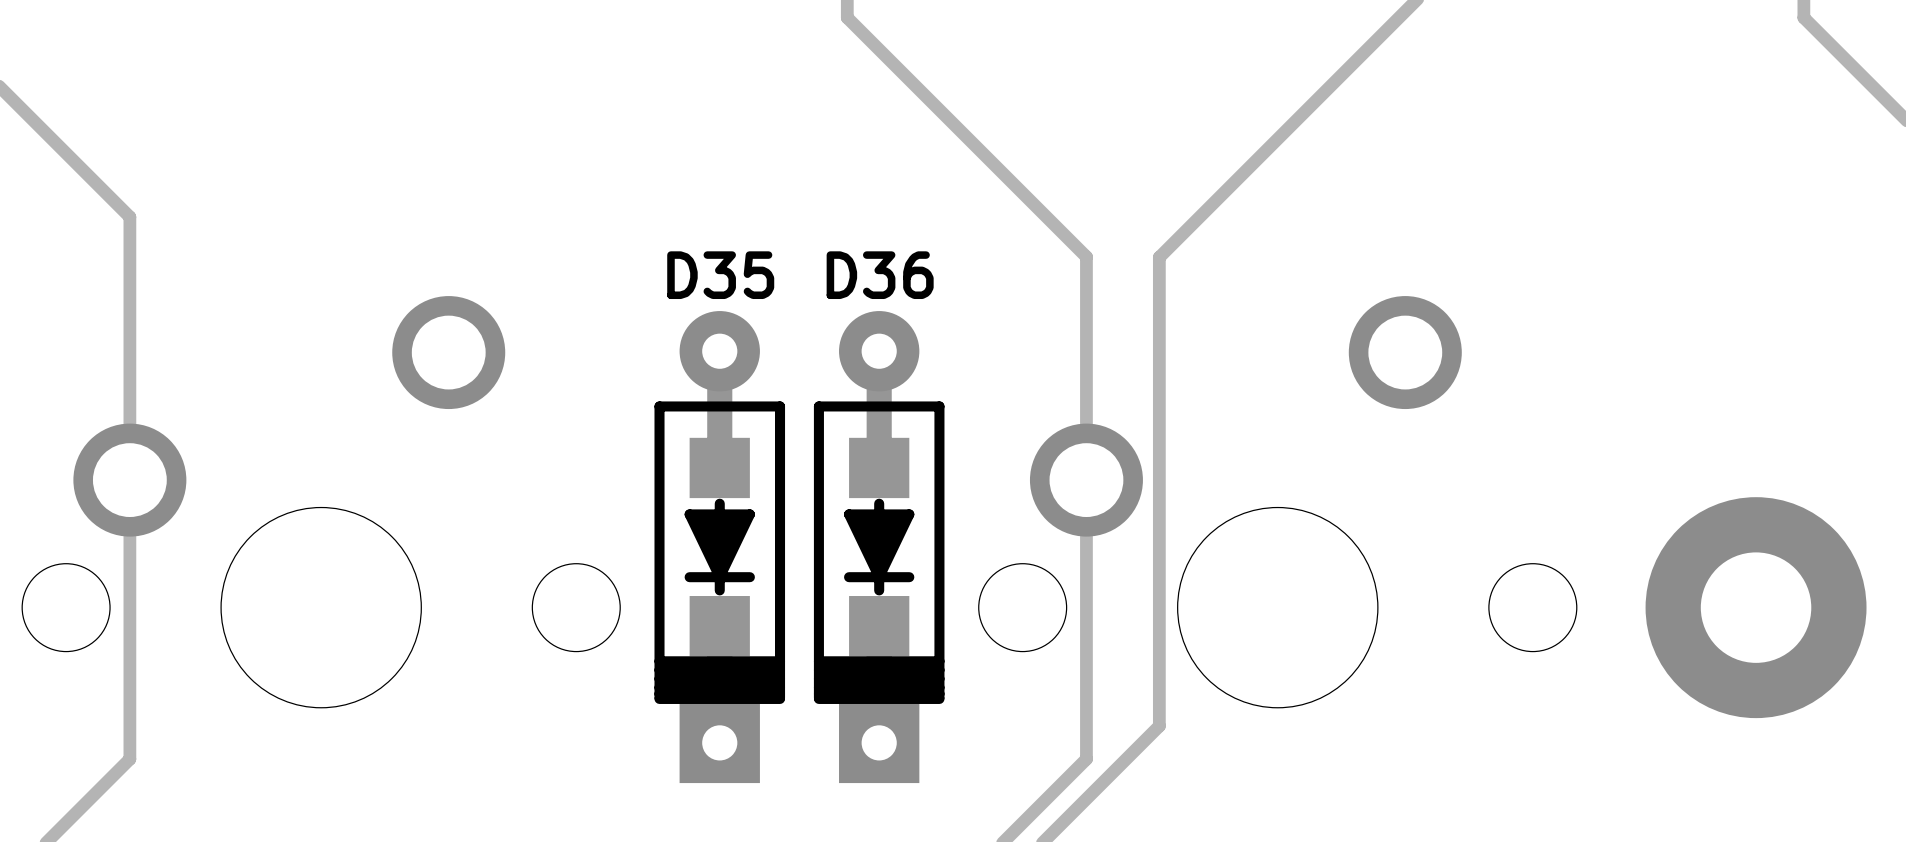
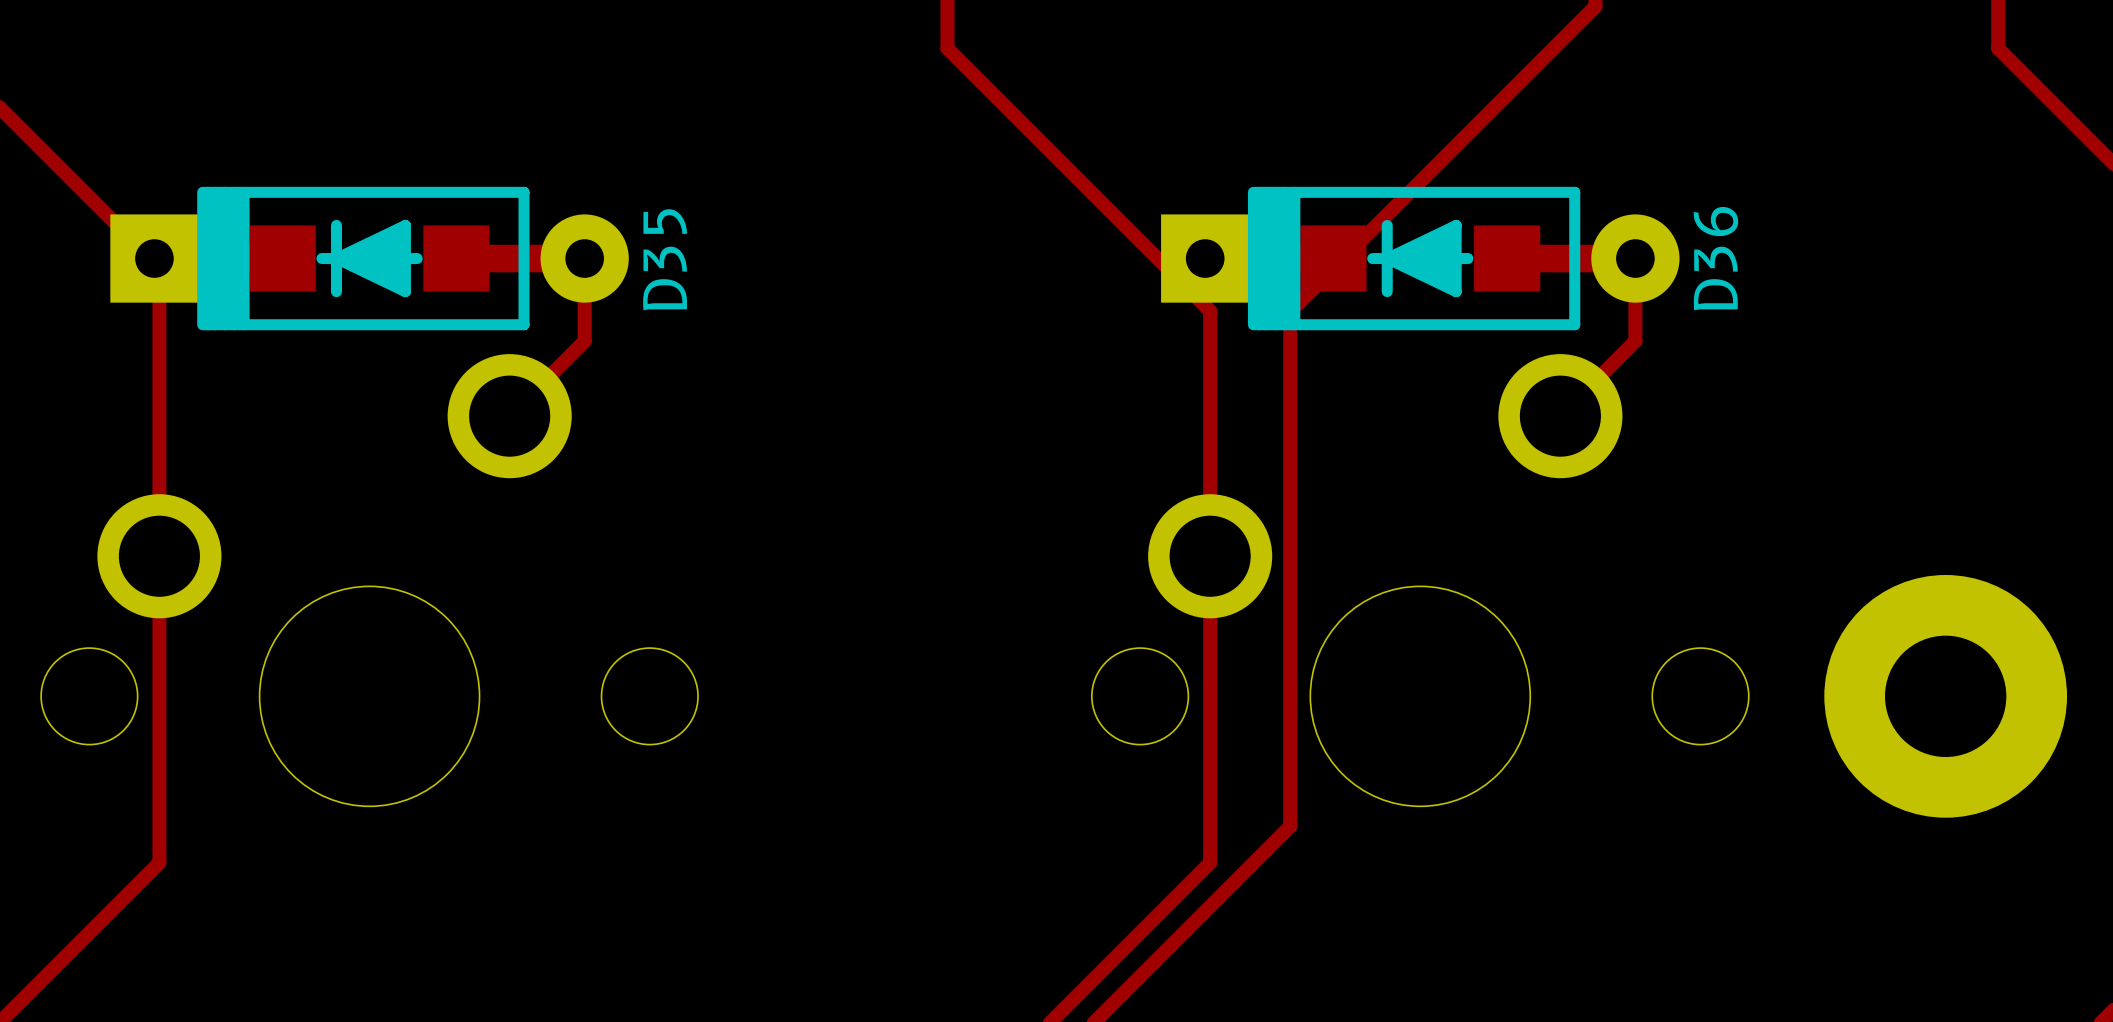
track: none -> (584, 258) (584, 341) (509, 416)
track: none -> (1635, 258) (1635, 341) (1560, 416)
D35 rotation: 0° (719, 547) -> 90° clockwise (369, 258)
D35 position: (719, 547) -> (369, 258)
D36 rotation: 0° (879, 547) -> 90° clockwise (1420, 258)
D36 position: (879, 547) -> (1420, 258)

